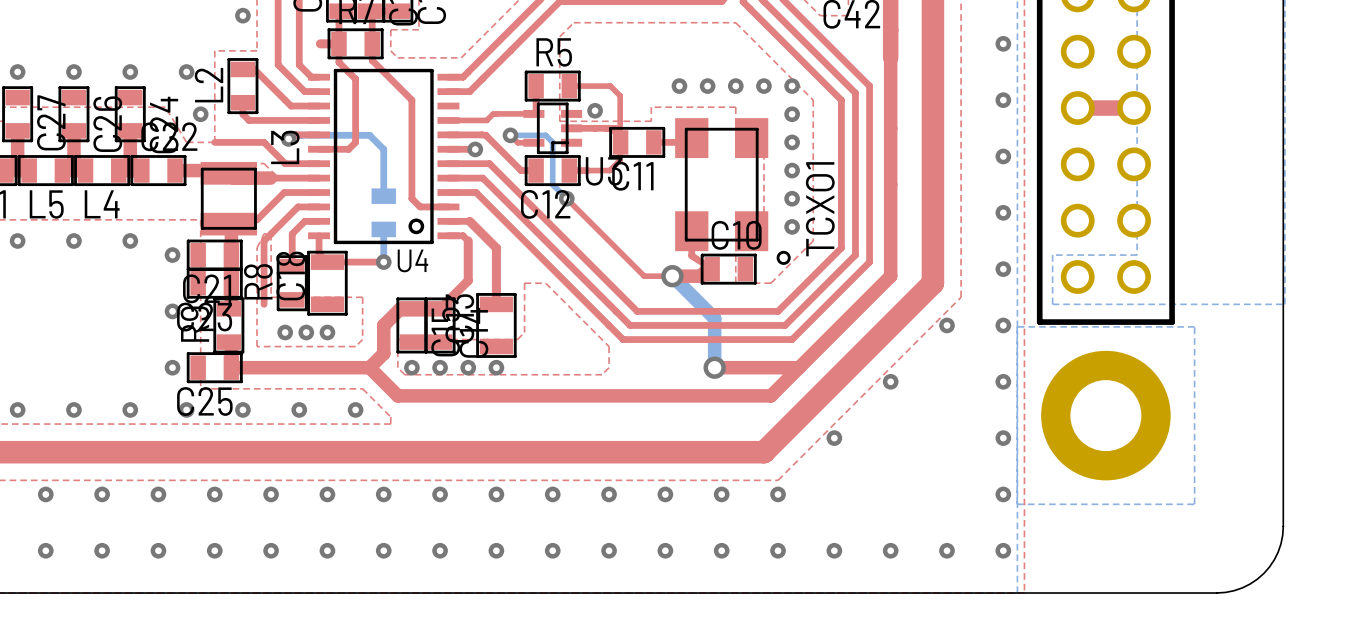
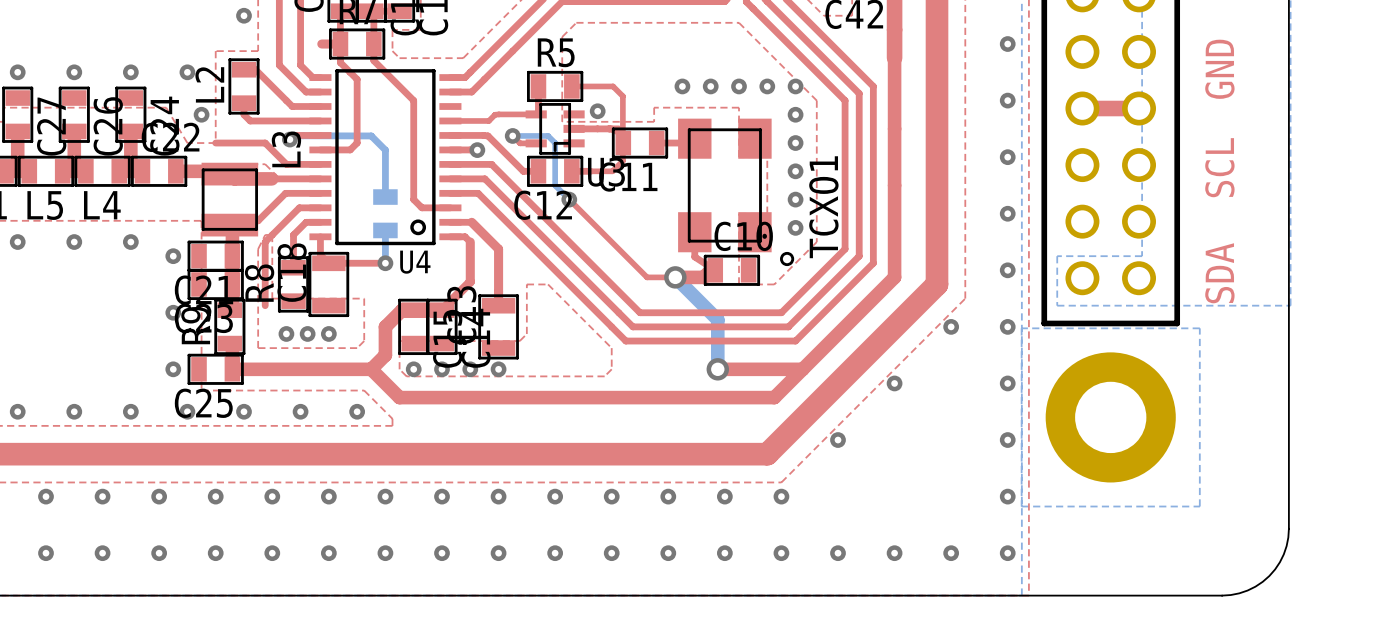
text: none -> GND (1219, 69)
text: none -> SCL (1219, 167)
text: none -> SDA (1219, 273)

